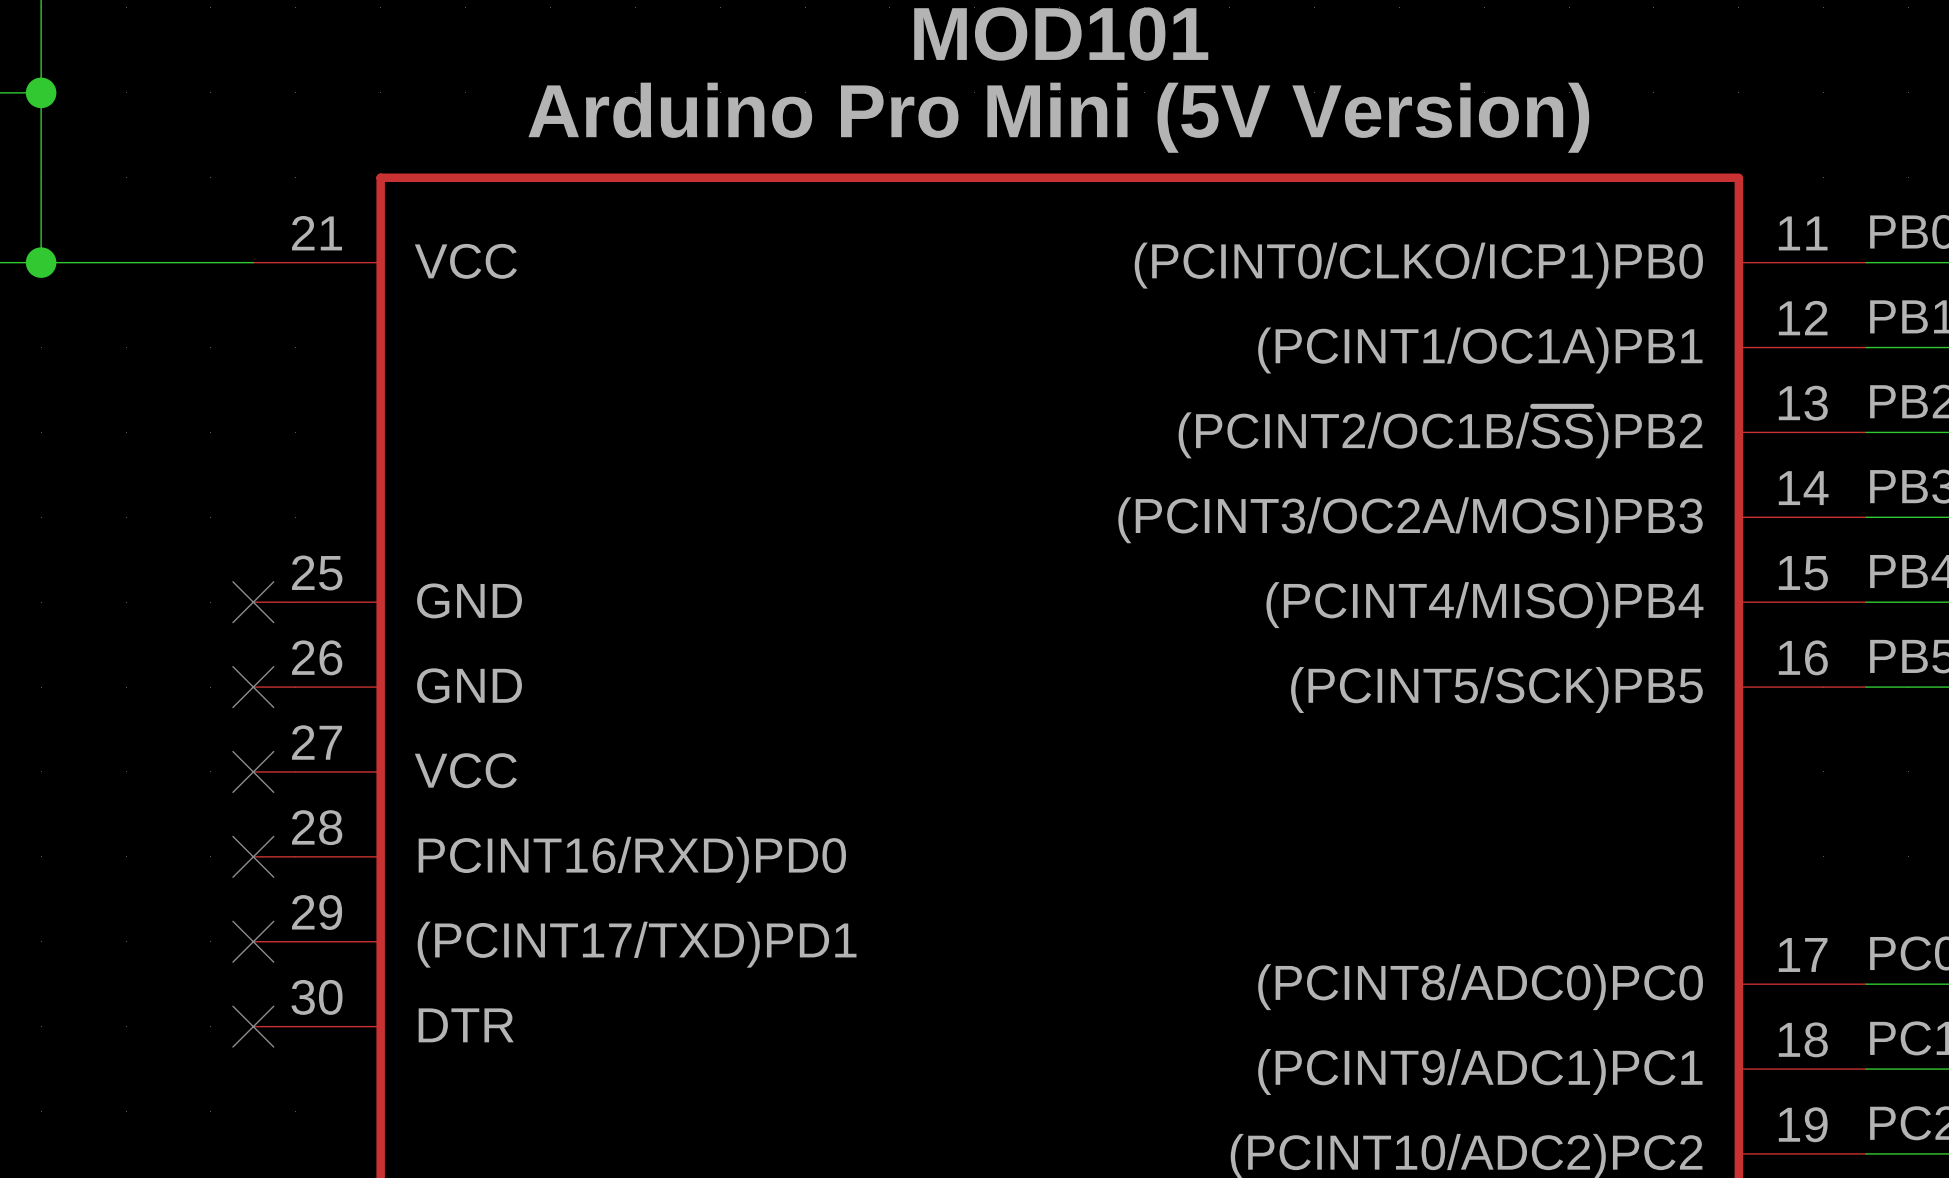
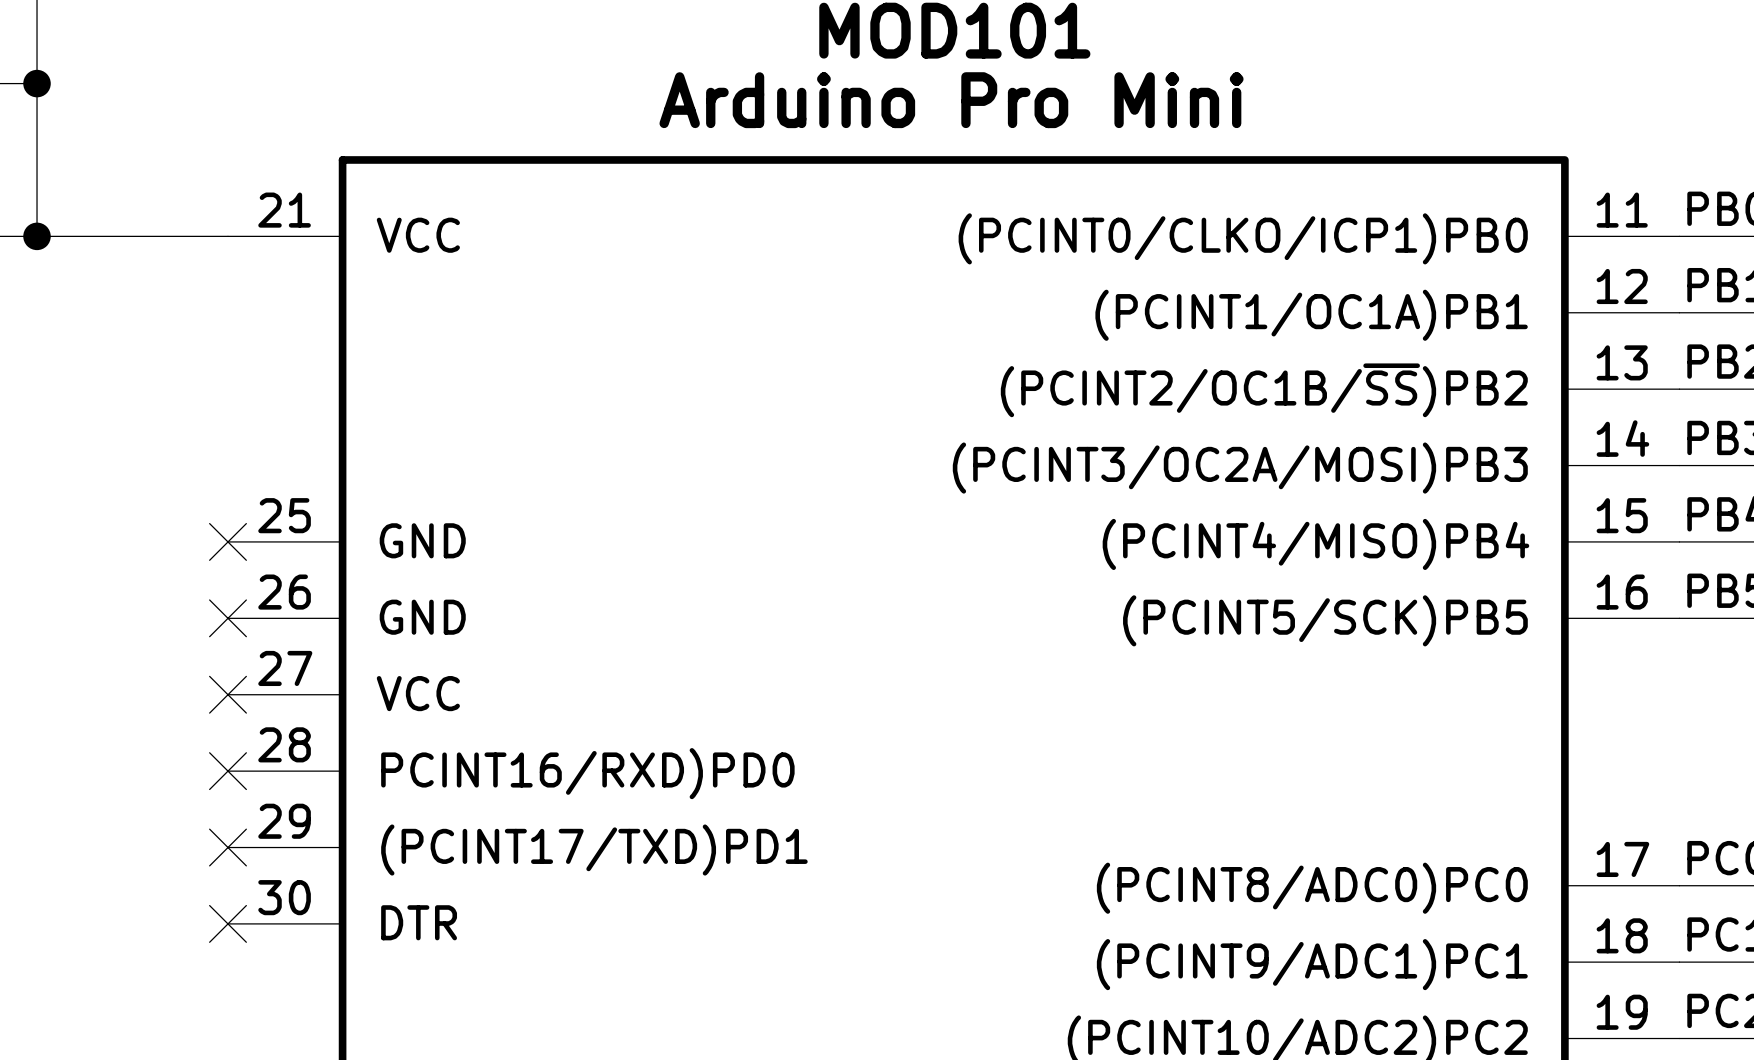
MOD101 value: Arduino Pro Mini (5V Version) (1058, 117) -> Arduino Pro Mini (951, 100)

